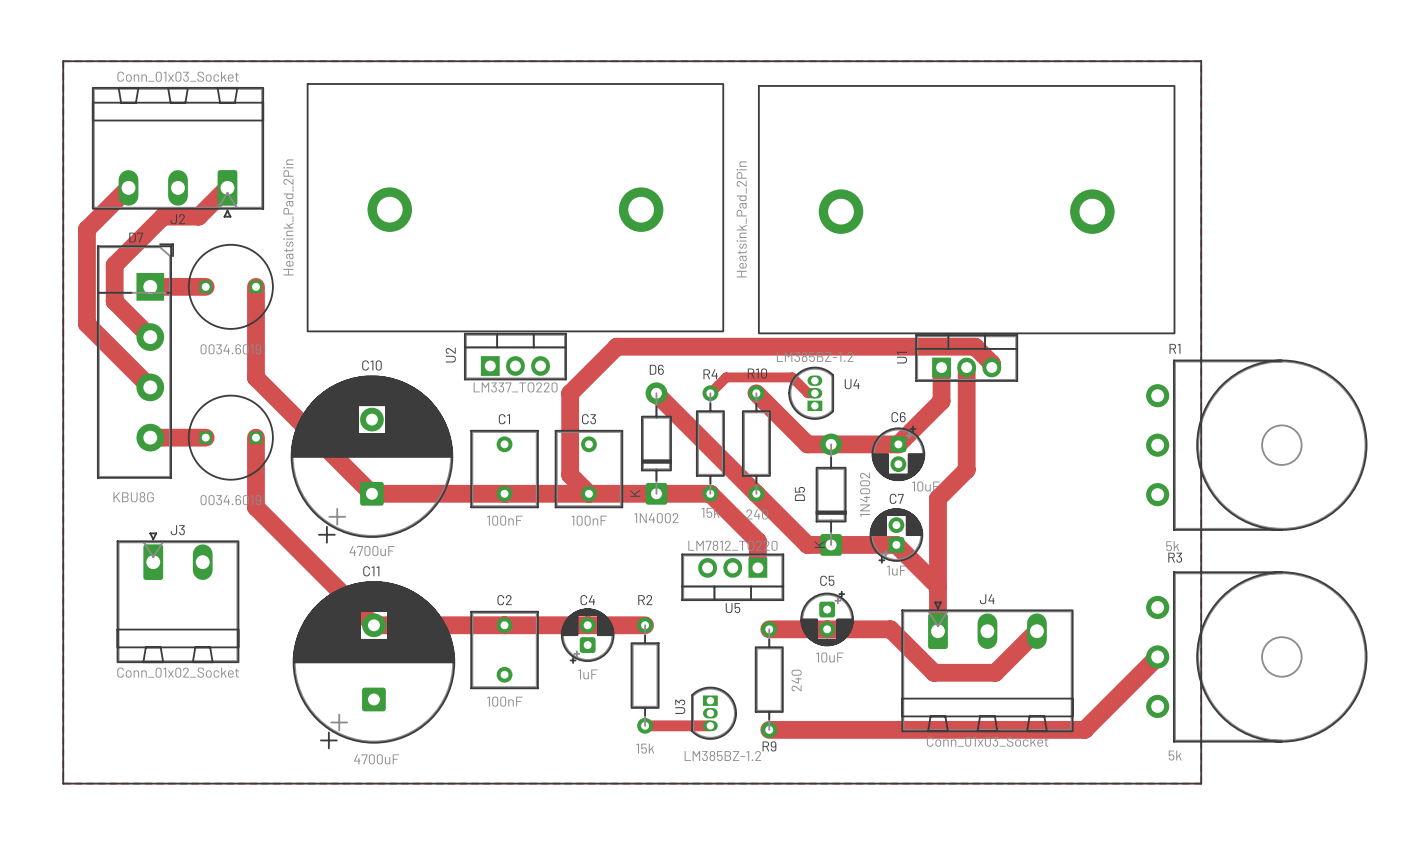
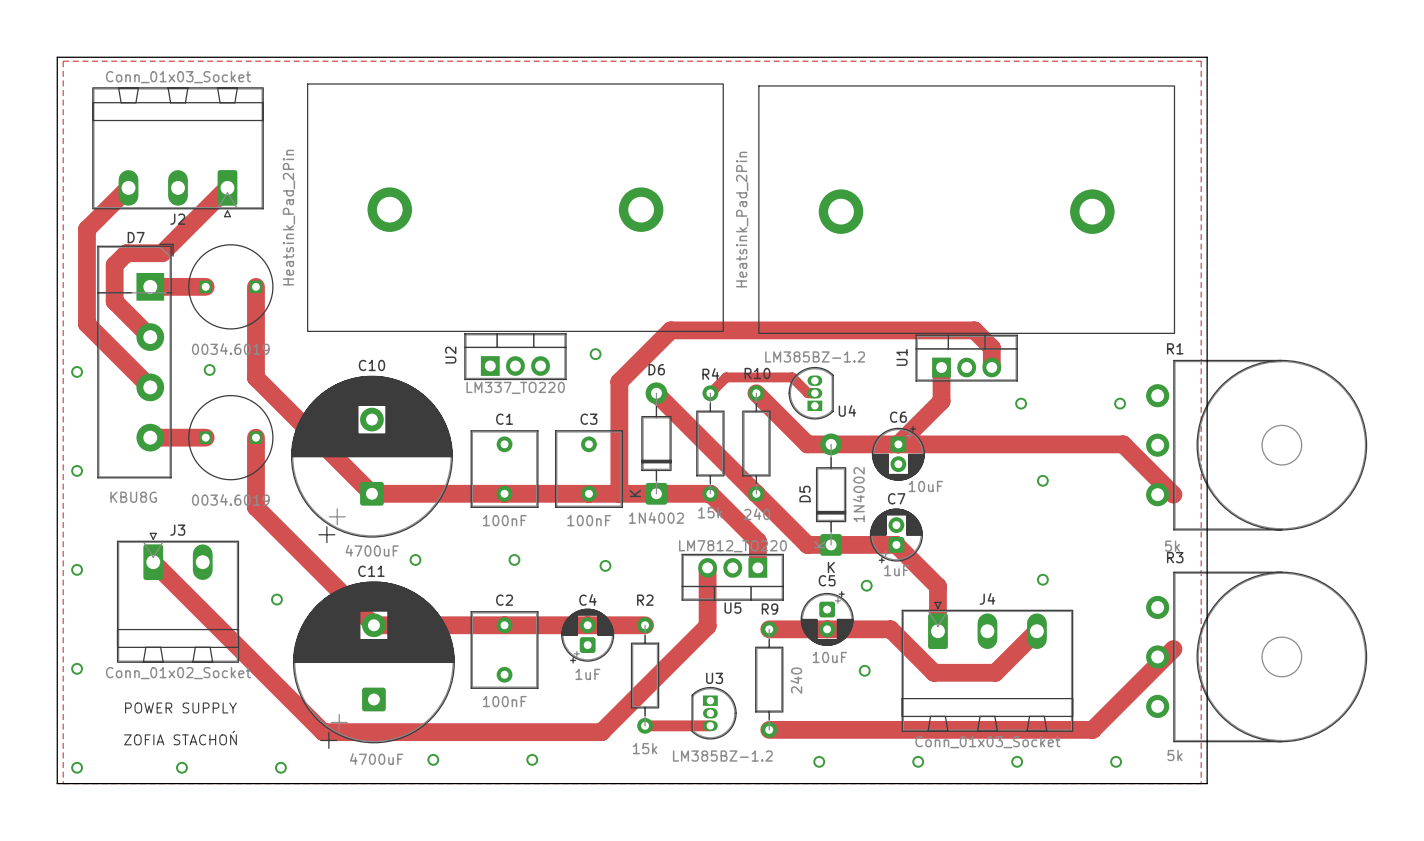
board edge: none -> (57, 57) (1207, 57) (1207, 783) (57, 783) (57, 57)
line: (63, 61) (1201, 61) (1201, 783) (63, 783) (63, 61) -> none
track: (198, 216) (163, 216) (126, 253) -> (198, 216) (162, 253) (126, 253)
via: none -> (595, 354)
track: (991, 363) (975, 346) (616, 346) (570, 393) (570, 474) (588, 493) -> (991, 363) (991, 347) (974, 330) (670, 330) (619, 381) (619, 493)
track: (966, 367) (966, 469) (937, 498) (937, 586) -> none
via: none -> (209, 369)
via: none -> (77, 371)
U4 name position: U4 (852, 384) -> U4 (847, 410)
via: none -> (1021, 403)
via: none -> (1120, 403)
D5 footprint: [815, 433, 847, 556] -> [815, 433, 847, 556]
track: none -> (898, 444) (1123, 444) (1173, 494)
via: none -> (77, 470)
via: none -> (1042, 480)
via: none -> (415, 559)
via: none -> (514, 559)
track: none -> (153, 562) (323, 732) (601, 732) (707, 626) (707, 567)
via: none -> (605, 565)
via: none -> (77, 569)
via: none -> (1042, 579)
via: none -> (866, 585)
via: none -> (276, 599)
track: (1157, 656) (1084, 729) -> (1173, 649) (1092, 729) (1084, 729)
via: none -> (77, 668)
via: none -> (864, 670)
U3 name rotation: 0° (680, 706) -> 90° clockwise (714, 678)
U3 name position: U3 (680, 706) -> U3 (714, 678)
text: none -> POWER SUPPLY (180, 707)
text: none -> ZOFIA STACHOŃ (180, 737)
R9 name position: R9 (769, 746) -> R9 (769, 609)
via: none -> (433, 759)
via: none -> (532, 759)
via: none -> (819, 761)
via: none -> (918, 761)
via: none -> (1017, 761)
via: none -> (1116, 761)
via: none -> (77, 767)
via: none -> (181, 767)
via: none -> (280, 767)

